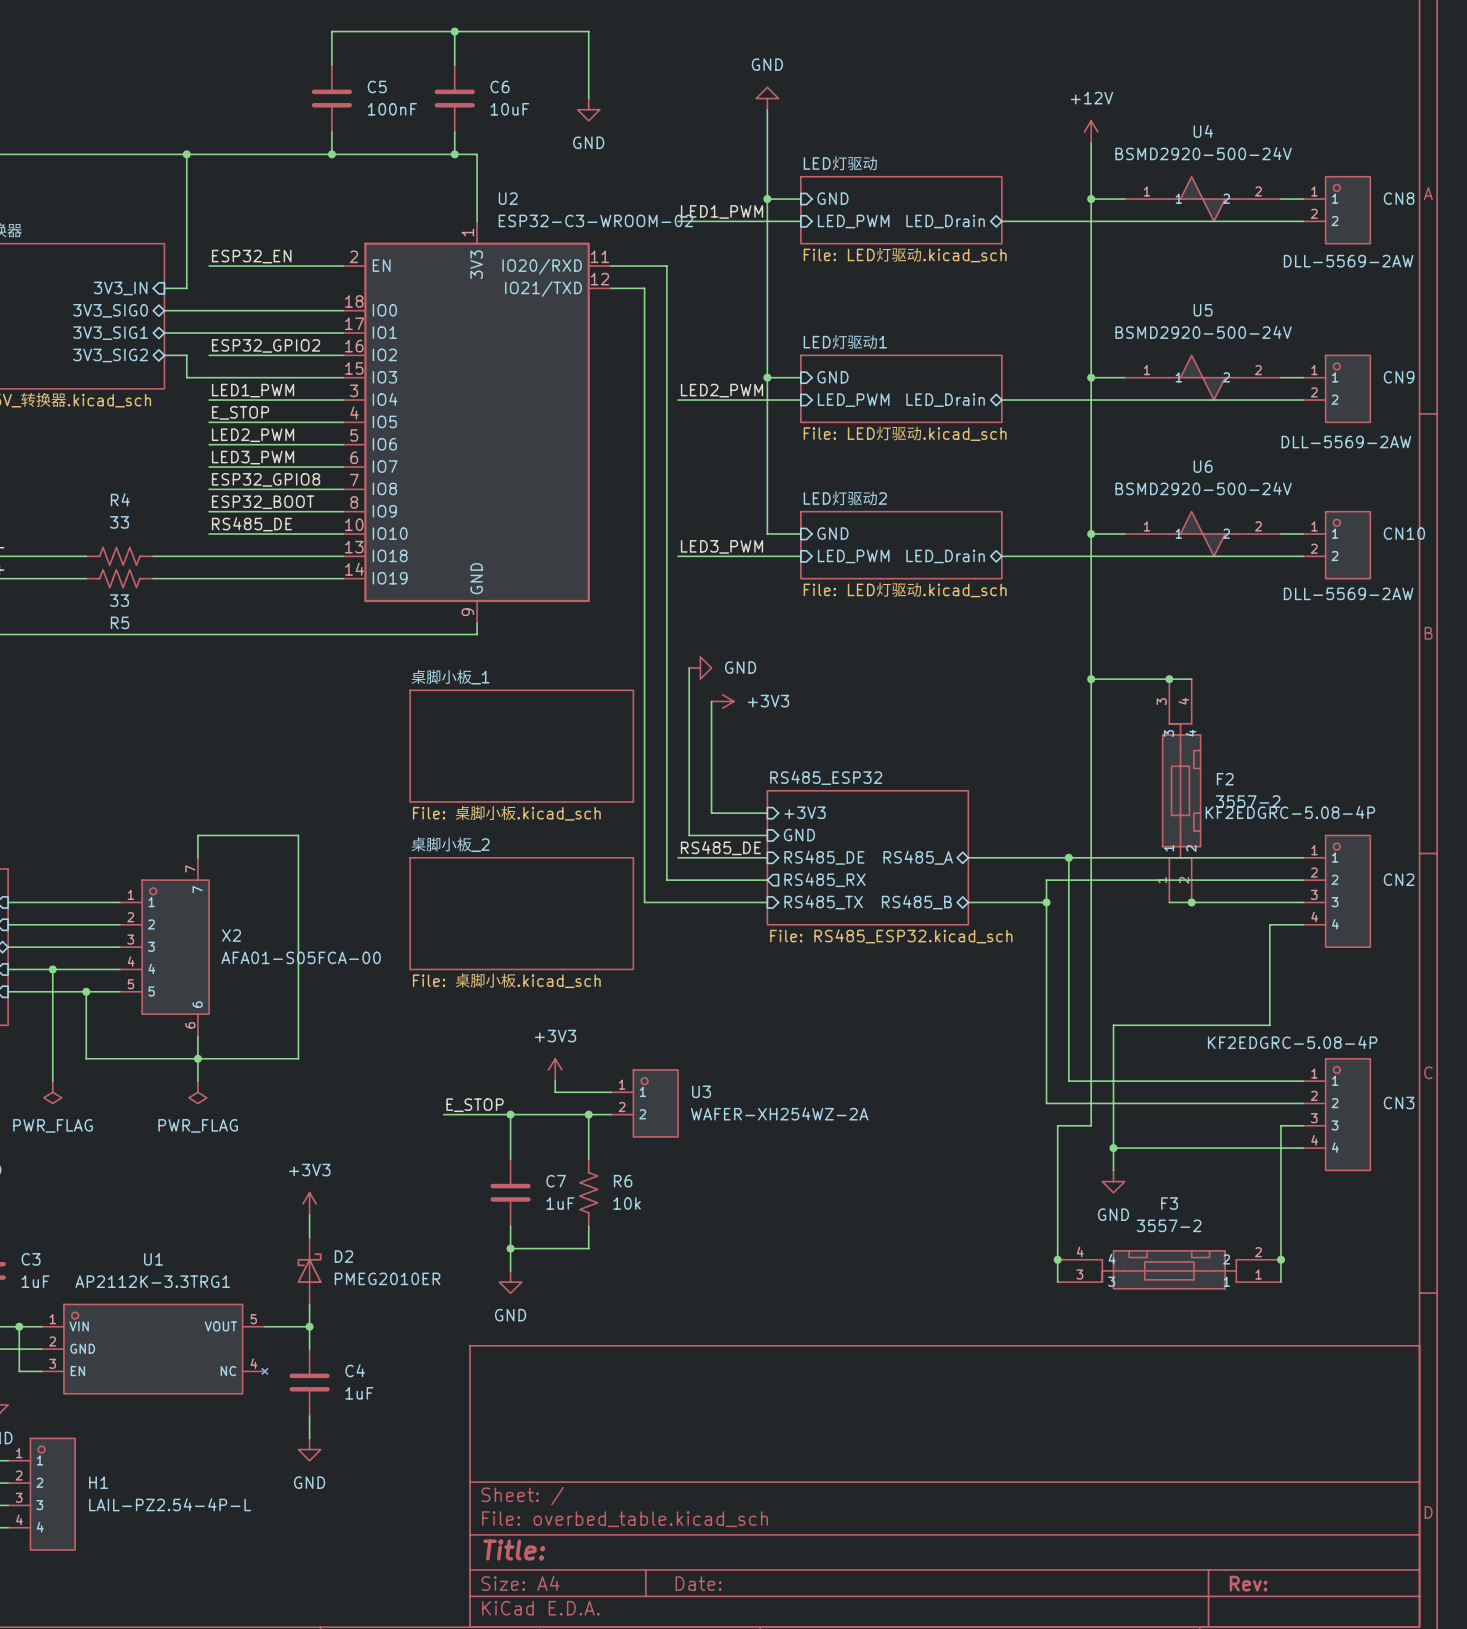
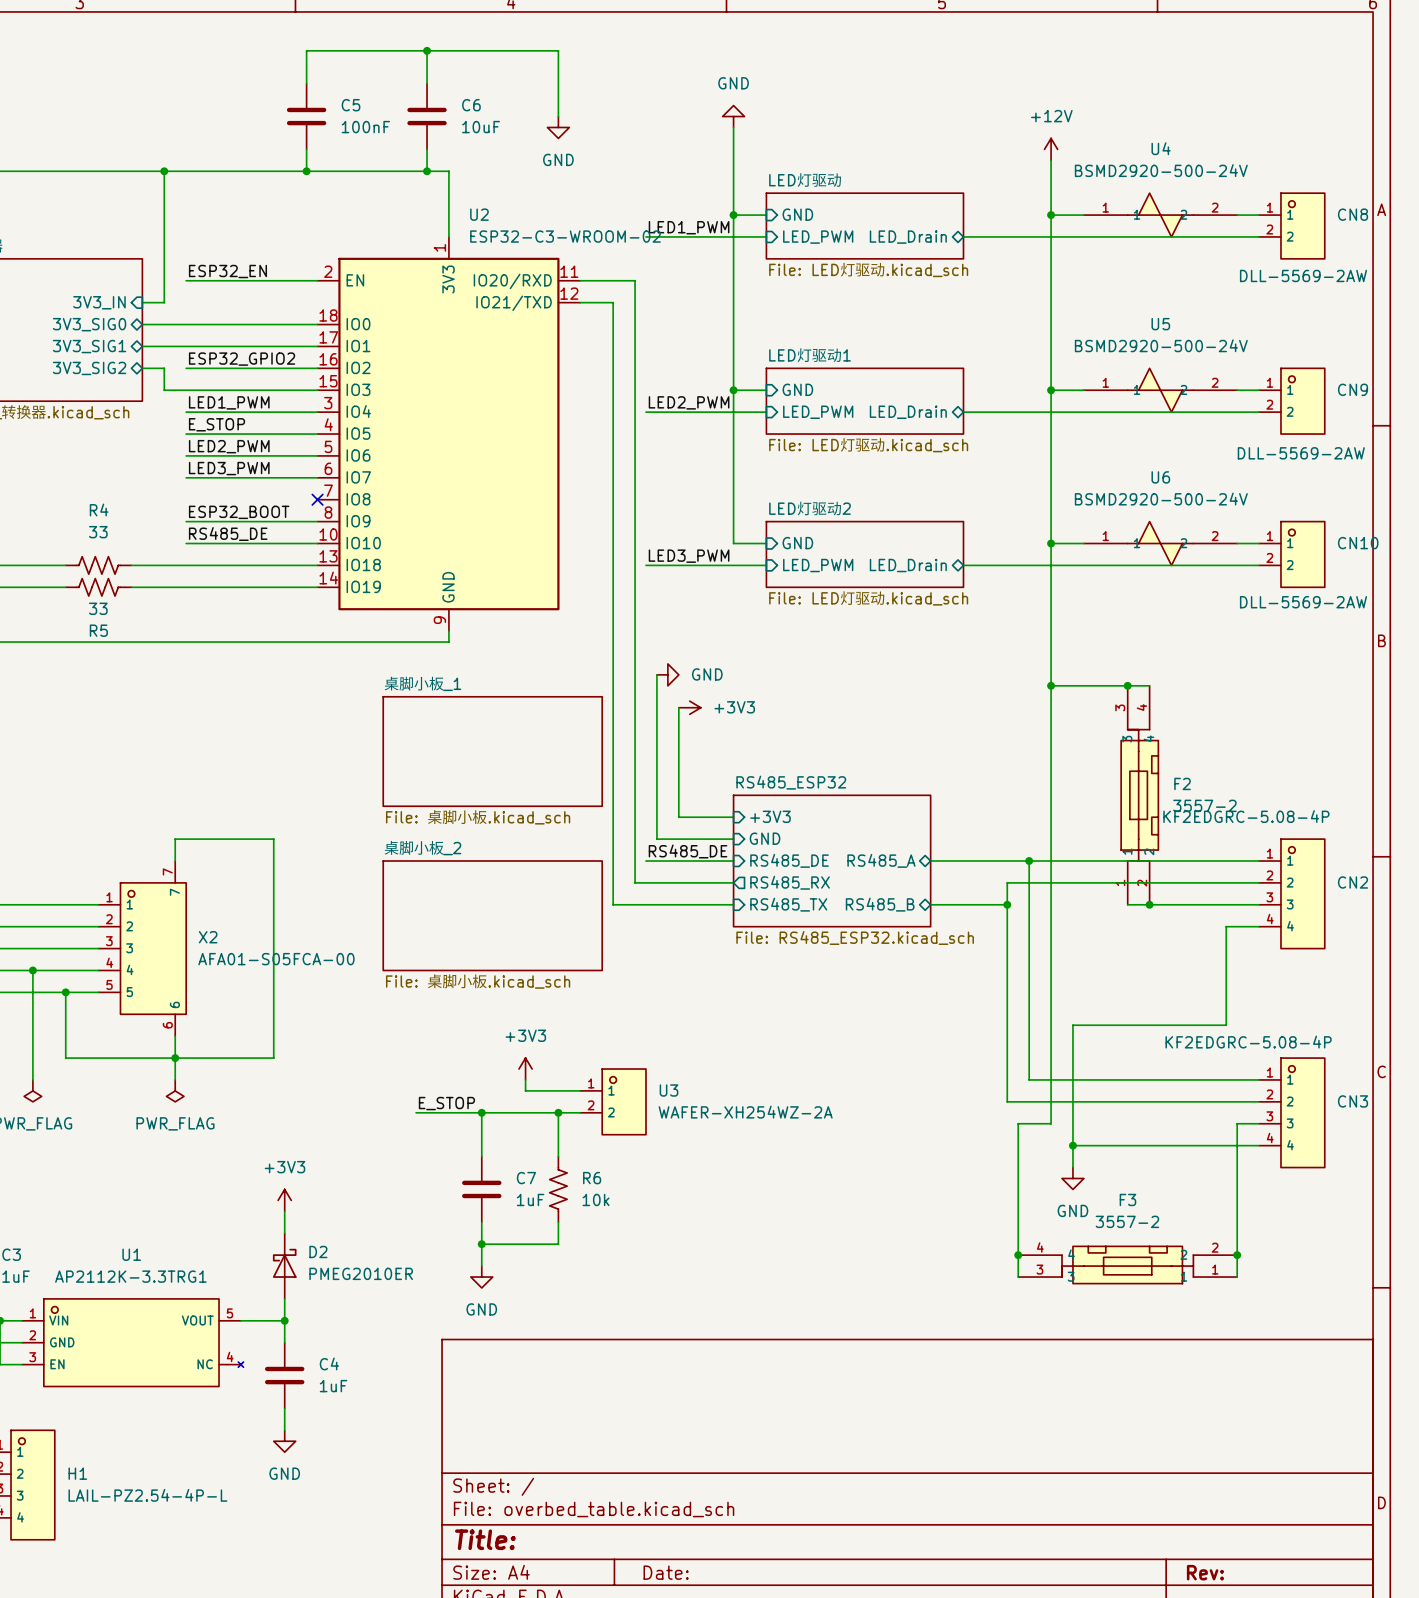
label: ESP32_GPIO8 (266, 479) -> none
wire: (209, 489) (343, 489) -> none
no-connect mark: none -> (317, 499)

